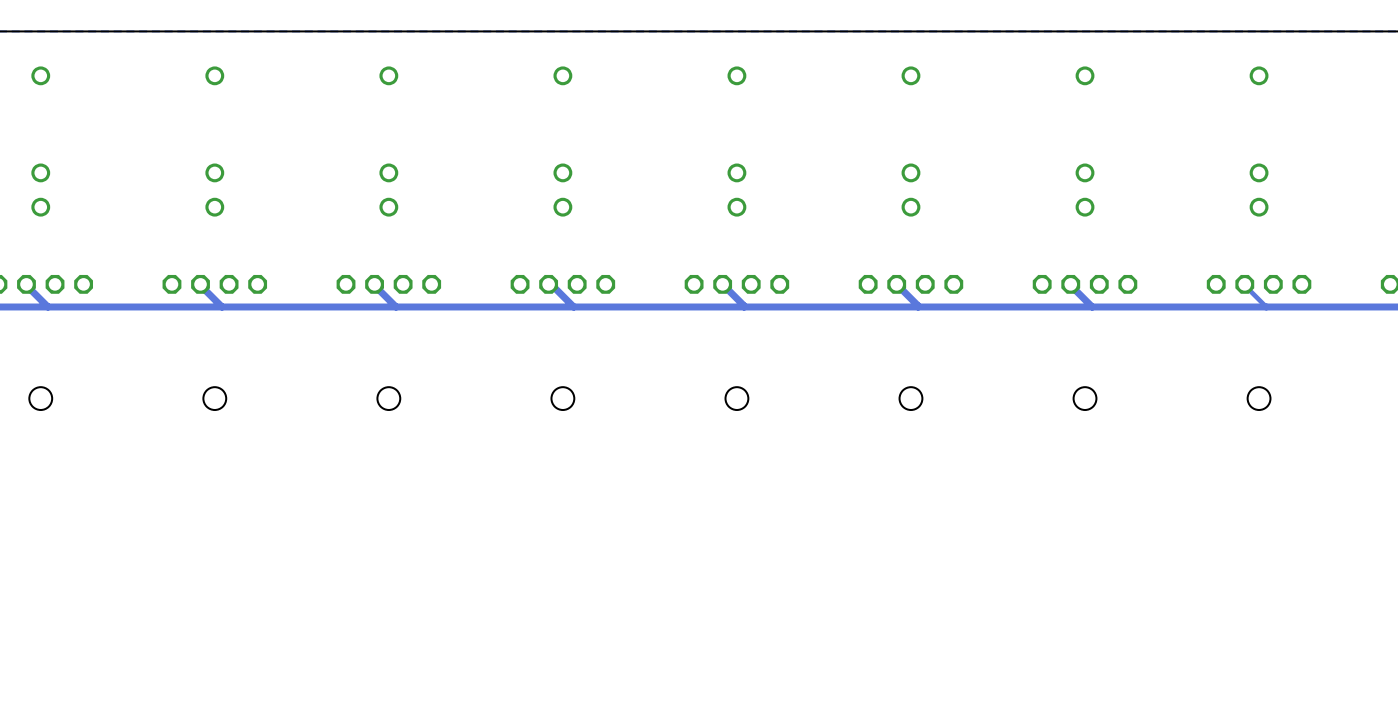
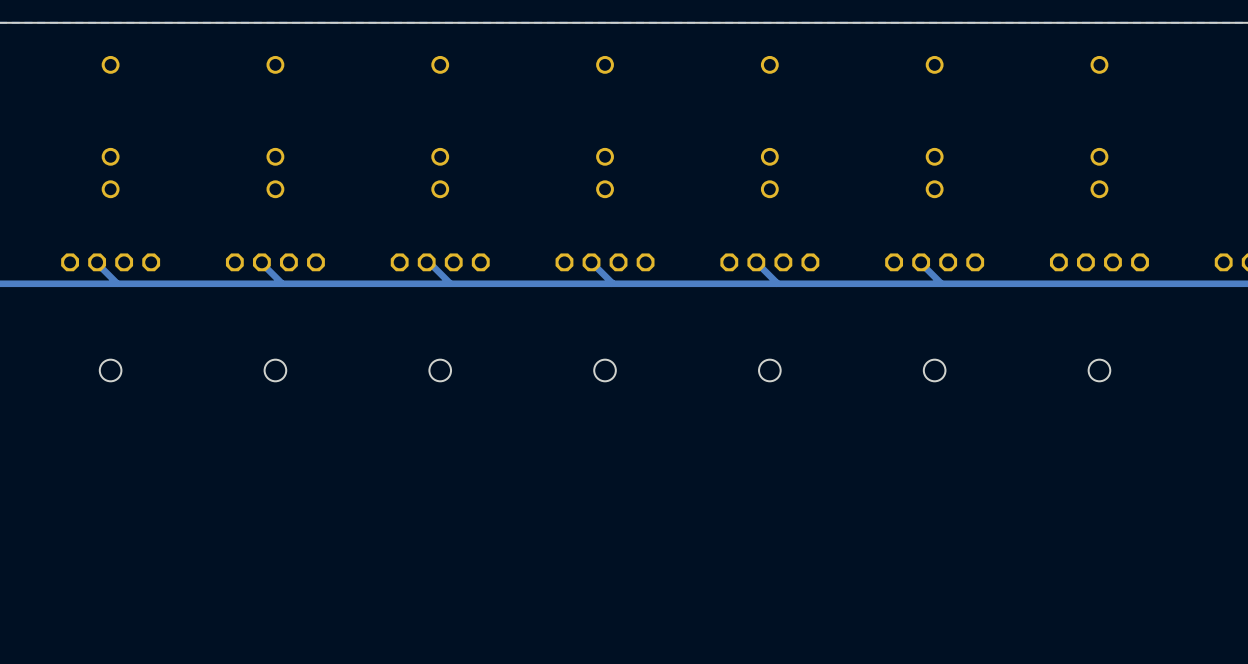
track: (1244, 284) (1266, 306) -> none

